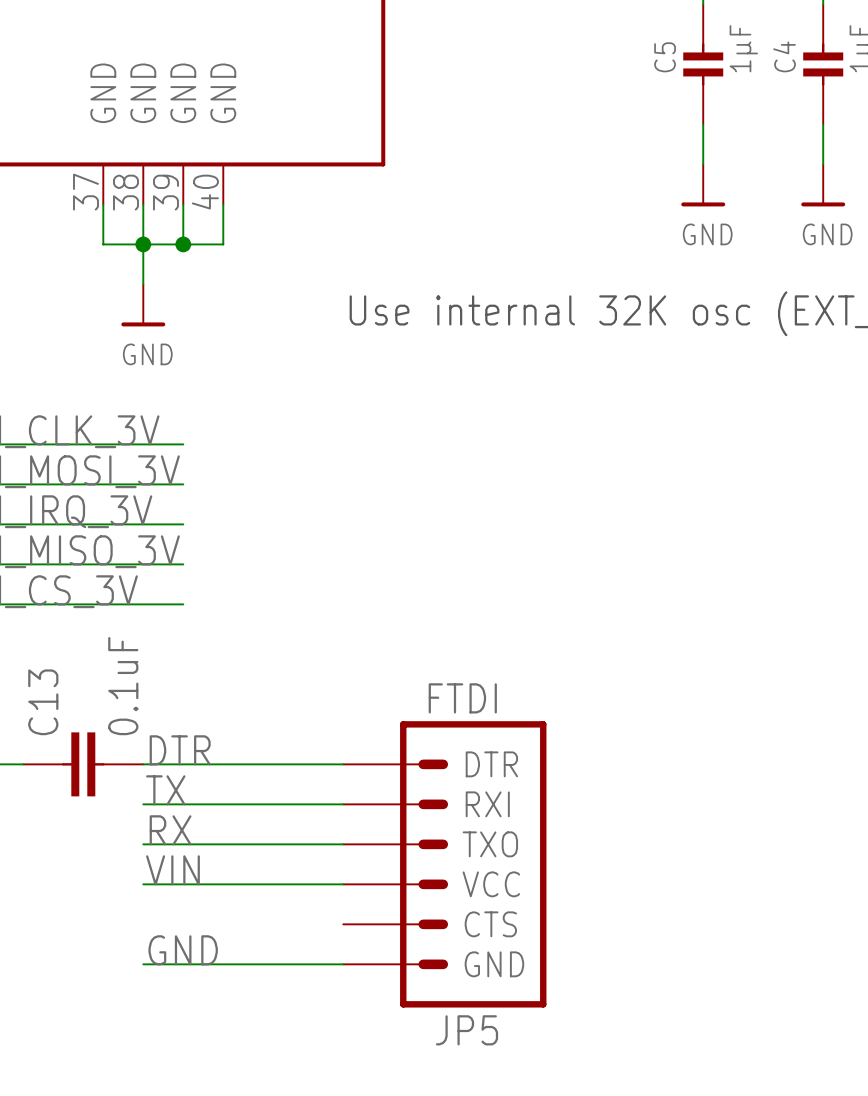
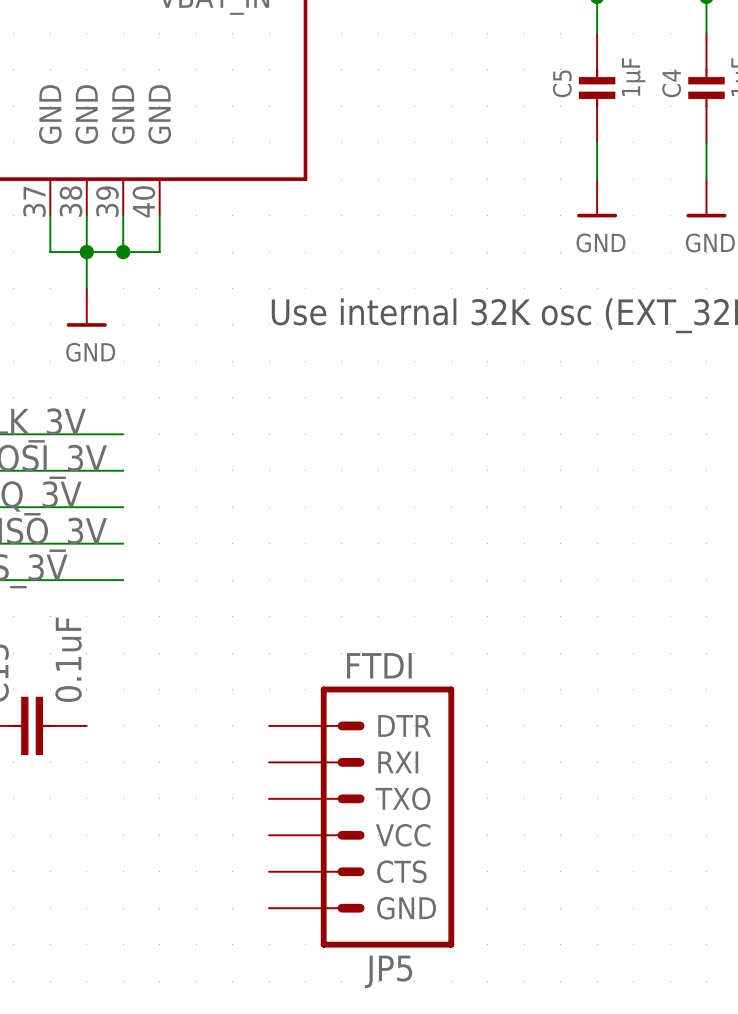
label: DTR (180, 750) -> none
wire: (143, 764) (343, 764) -> none
label: TX (165, 790) -> none
wire: (143, 804) (343, 804) -> none
label: RX (170, 830) -> none
wire: (143, 844) (343, 844) -> none
label: VIN (172, 870) -> none
wire: (143, 884) (343, 884) -> none
label: GND (183, 950) -> none
wire: (143, 964) (343, 964) -> none

